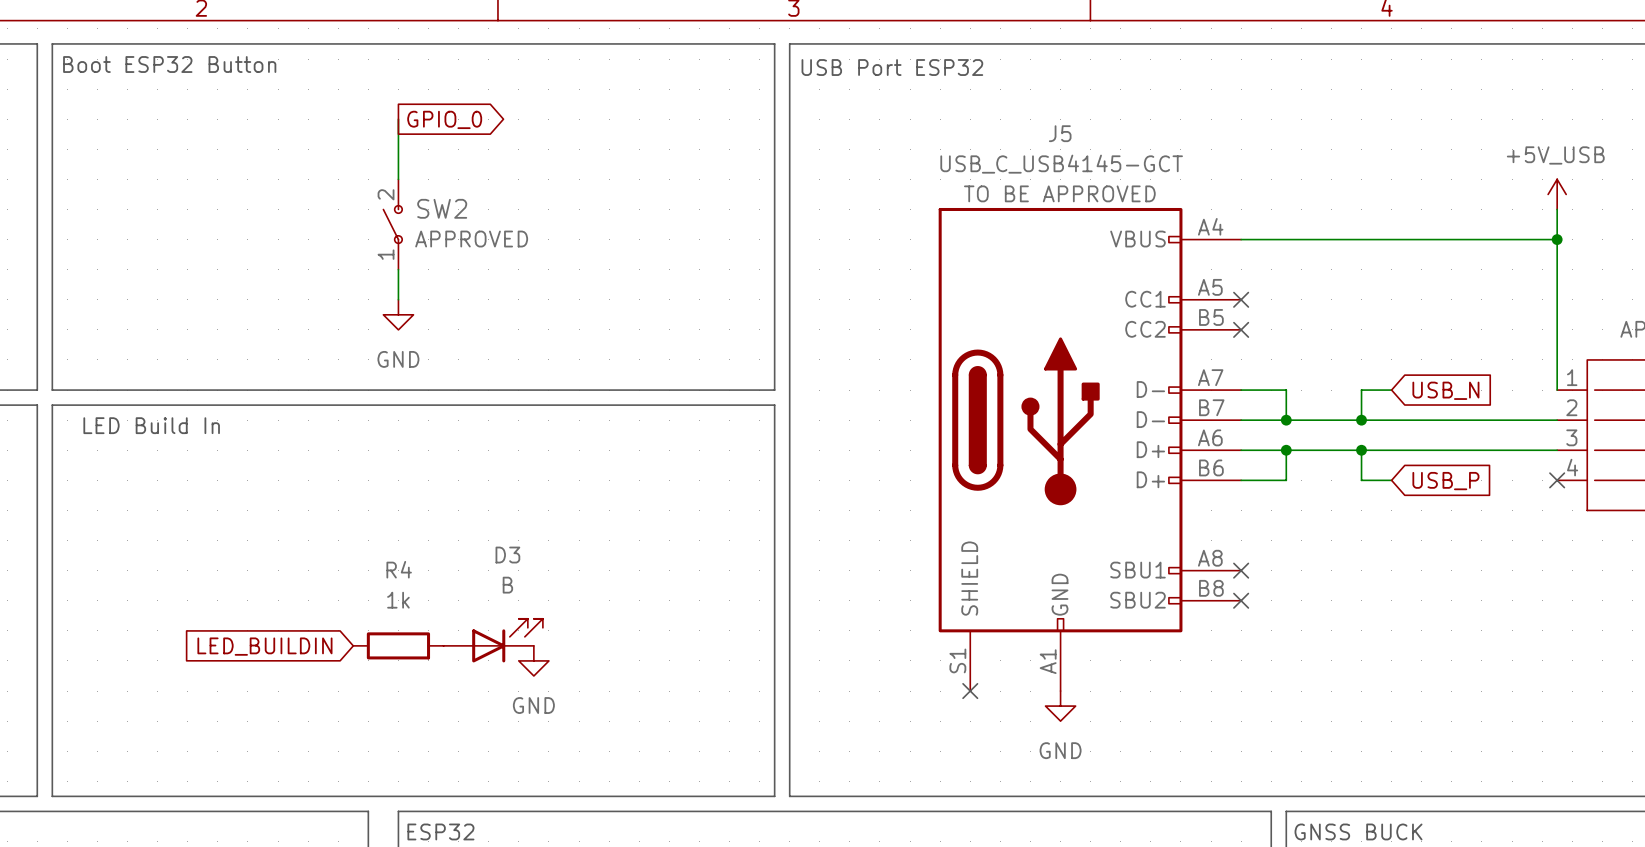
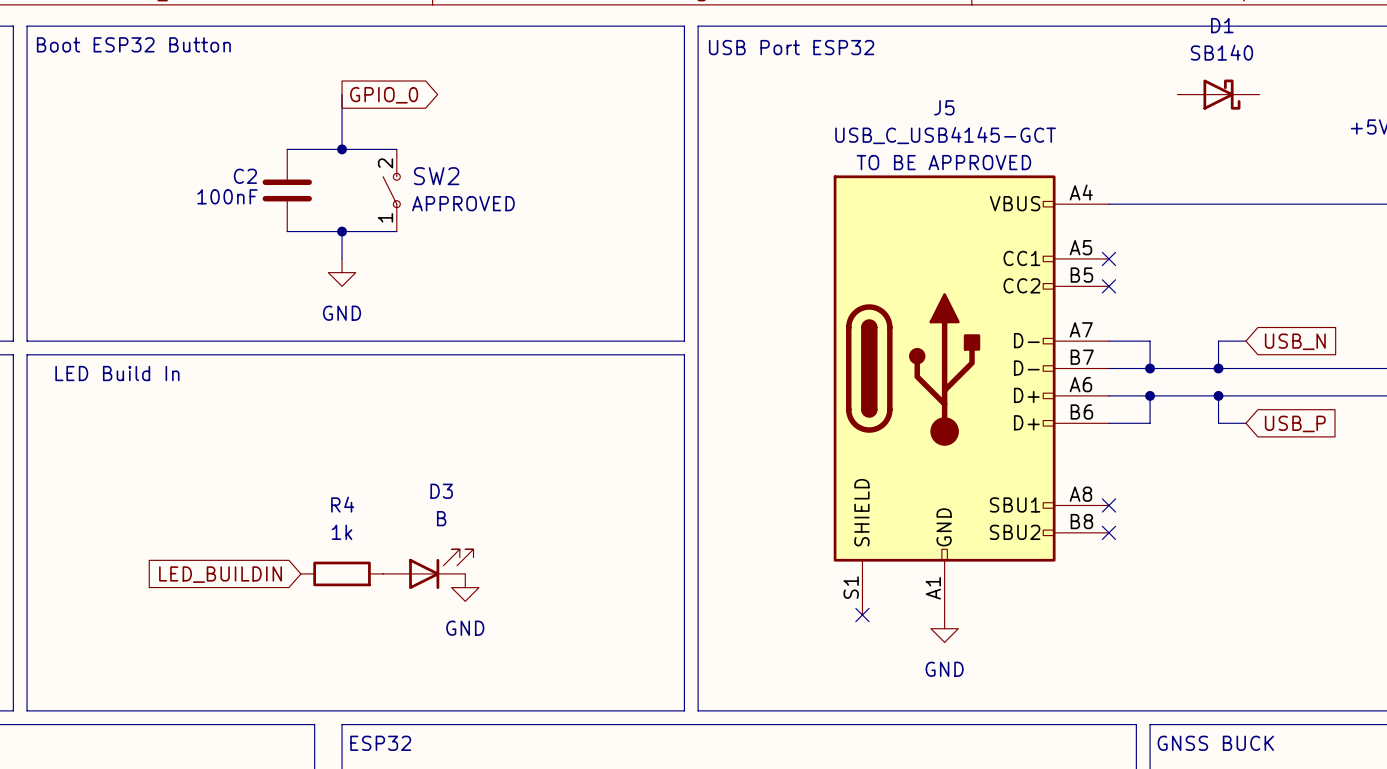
D1: none -> SB140 (1218, 94)
wire: none -> (287, 149) (396, 149)
junction: none -> (342, 149)
C2: none -> 100nF (287, 190)
SW2 position: (392, 224) -> (391, 190)
wire: none -> (287, 231) (396, 231)
junction: none -> (342, 231)

